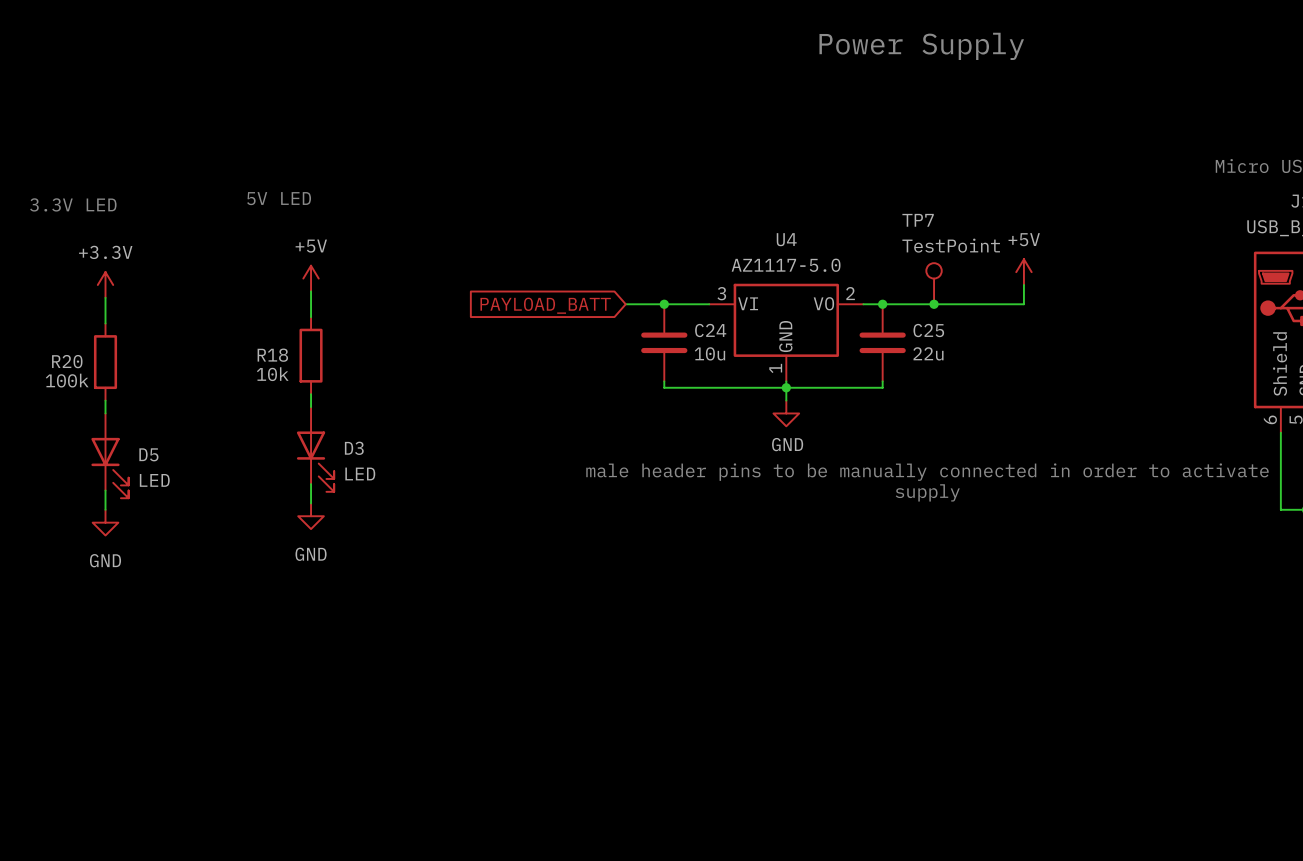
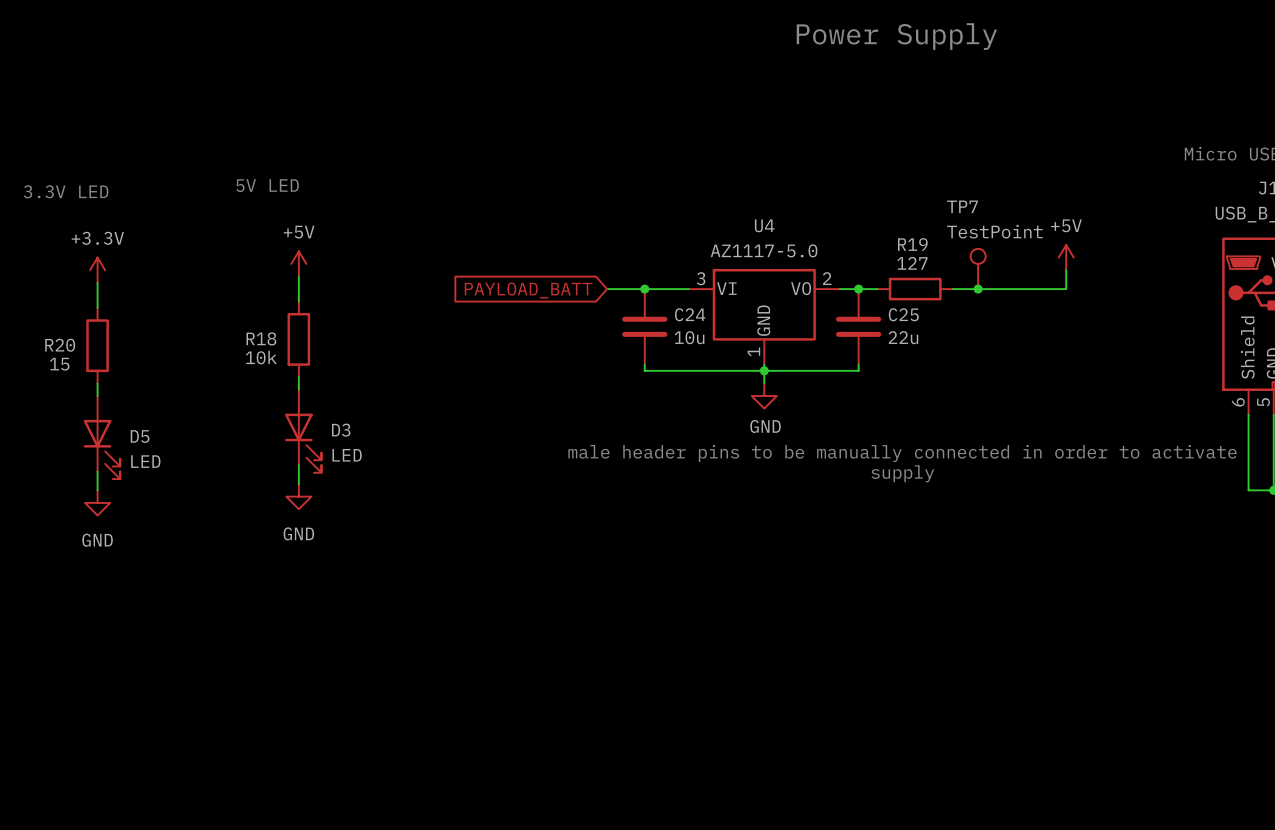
power symbol position: +5V (1023, 272) -> +5V (1066, 257)
TP7 position: (934, 283) -> (978, 268)
wire: (1023, 285) (1023, 304) -> (1066, 270) (1066, 289) (996, 289)
wire: (901, 304) (979, 304) -> none
junction: (934, 304) -> none
R19: none -> 127 (915, 289)
junction: none -> (978, 289)
R20 value: 100k (67, 380) -> 15 (59, 364)

